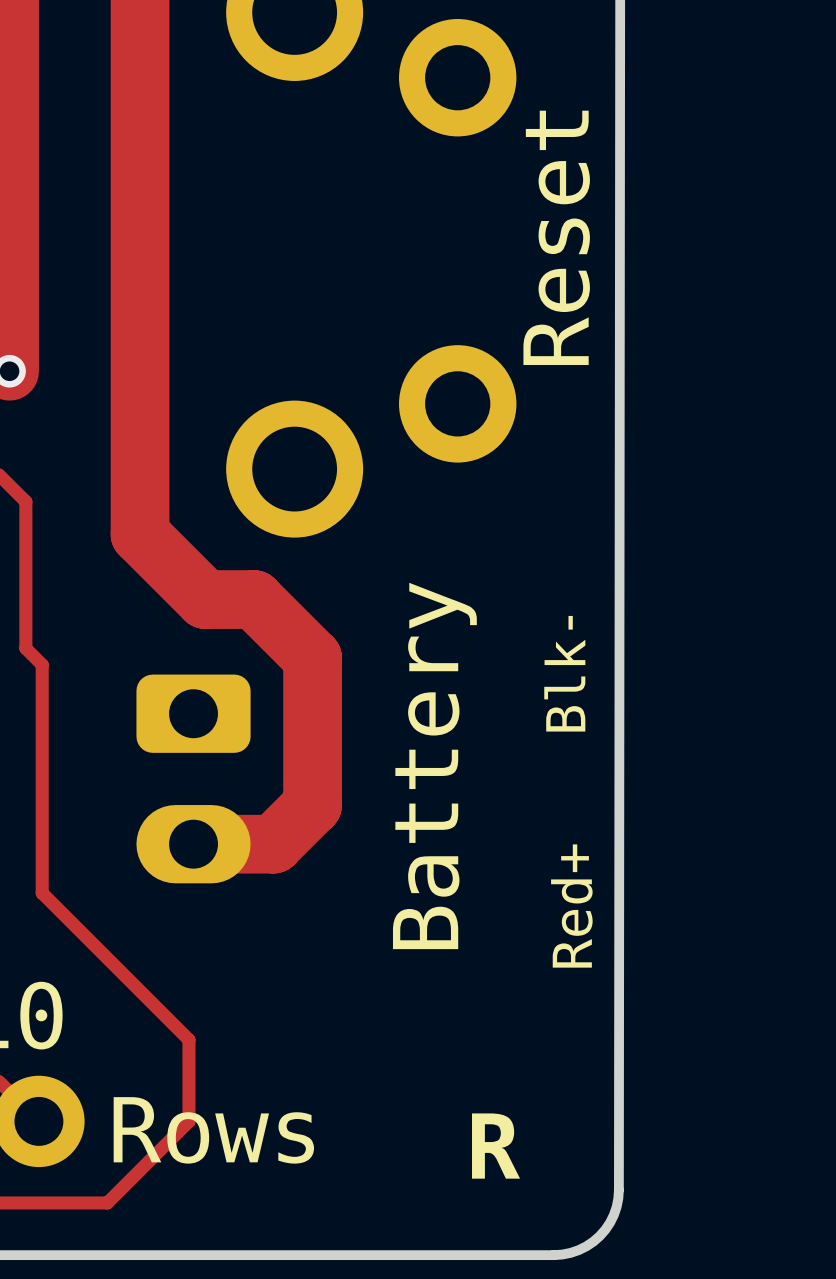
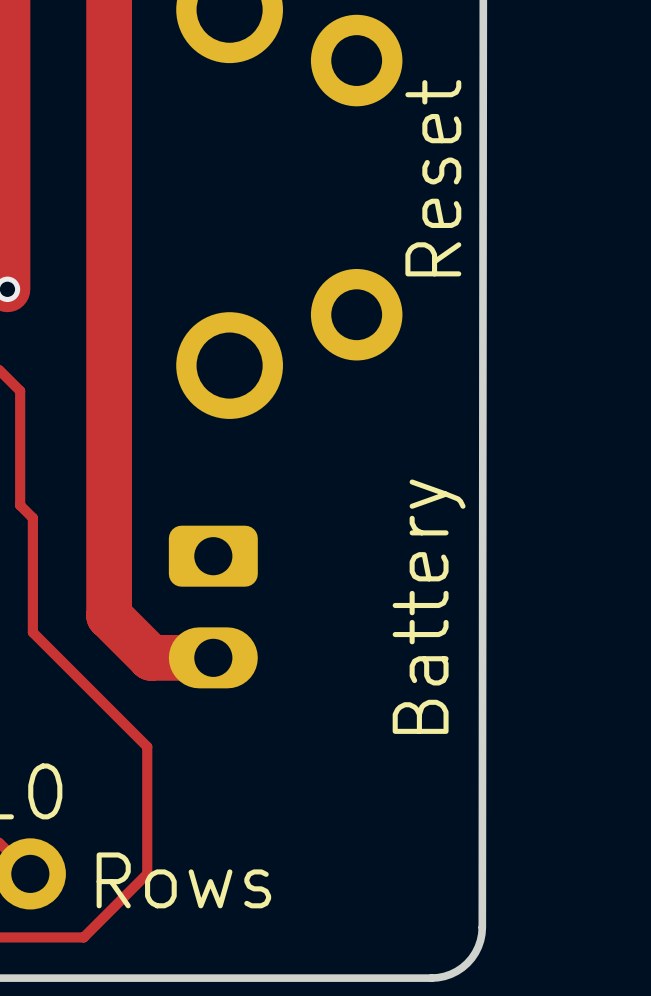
track: (140, 534) (205, 599) (254, 599) (312, 658) (312, 805) (273, 844) -> (109, 416) (109, 615) (151, 657)
text: Blk- (564, 673) -> none
text position: Battery (434, 765) -> Battery (429, 606)
part position: (193, 778) -> (213, 607)
track: (42, 811) (42, 893) (188, 1039) -> (32, 632) (147, 746) (147, 810)
text: Red+ (571, 906) -> none
text: R (496, 1146) -> none

